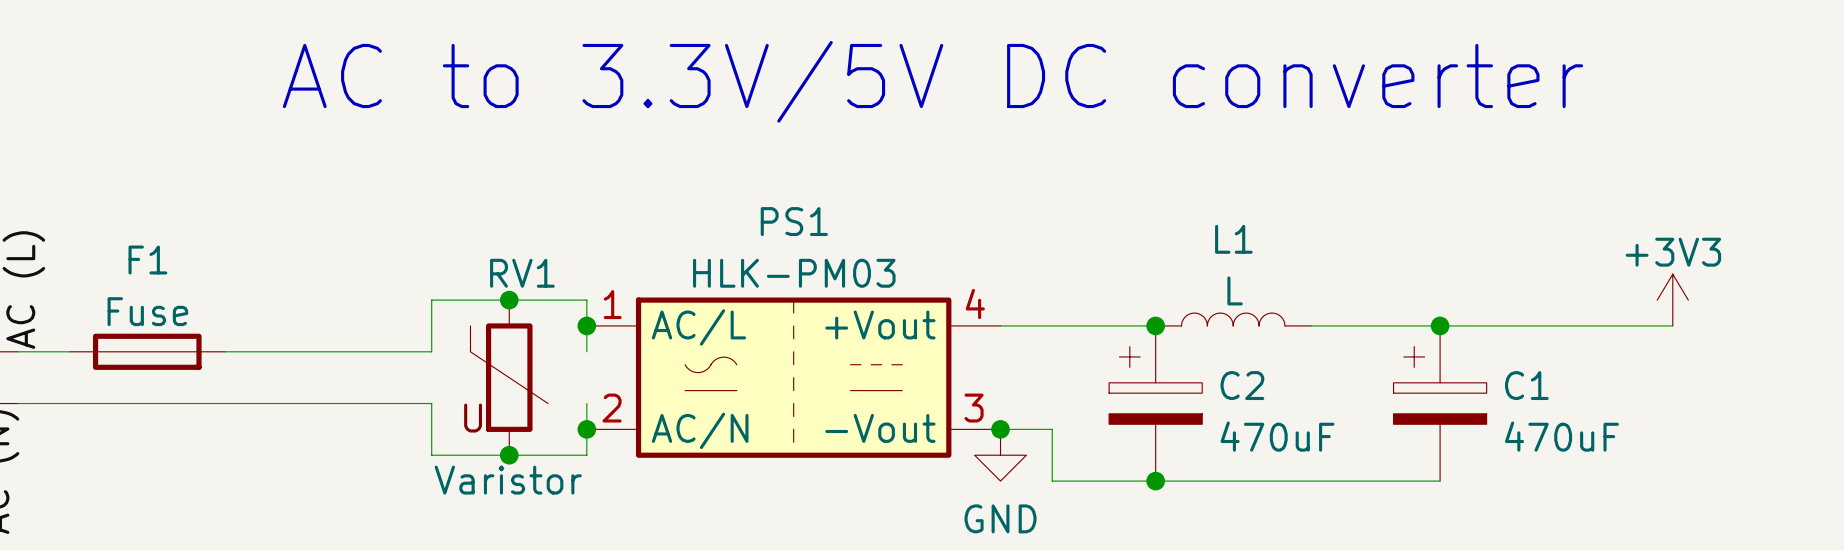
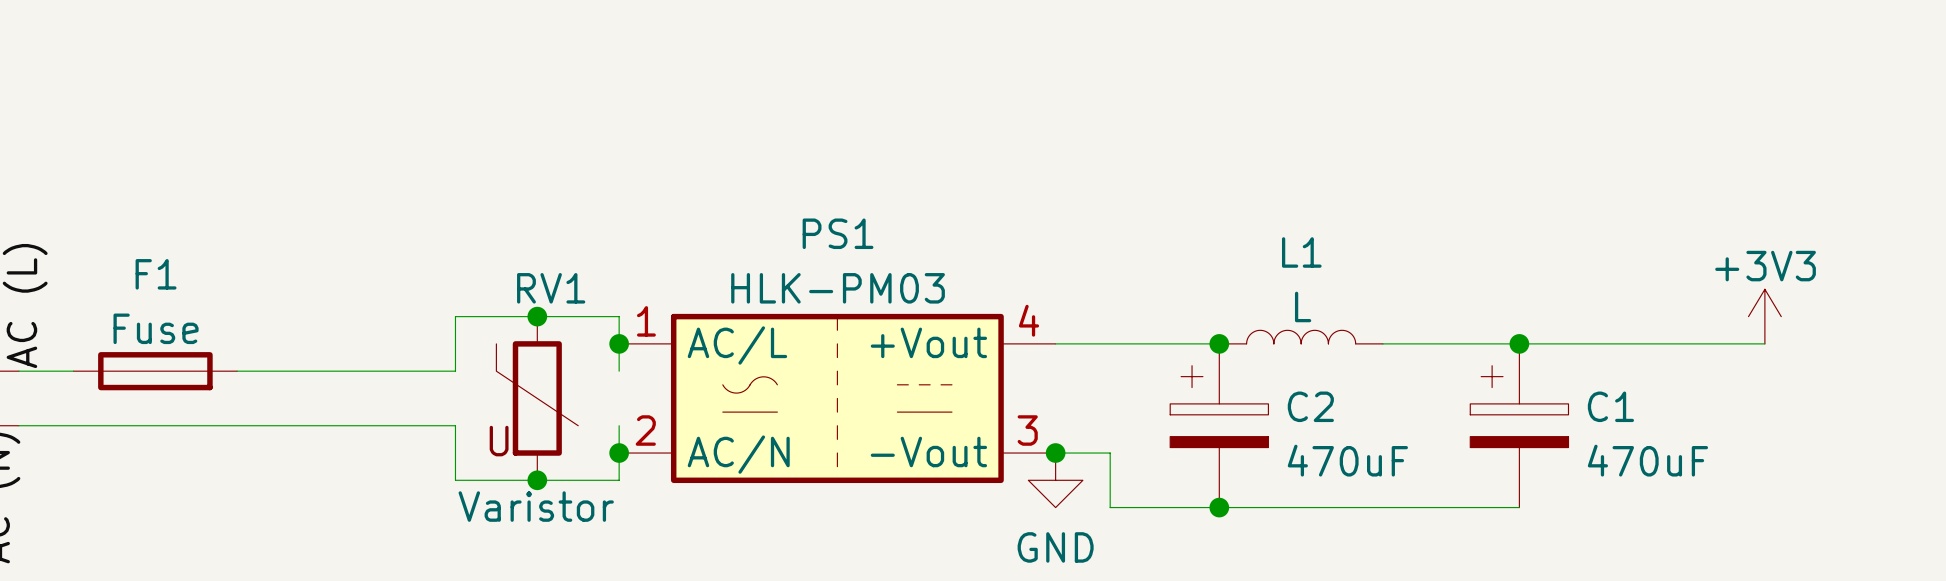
text: AC to 3.3V/5V DC converter (933, 81) -> none

